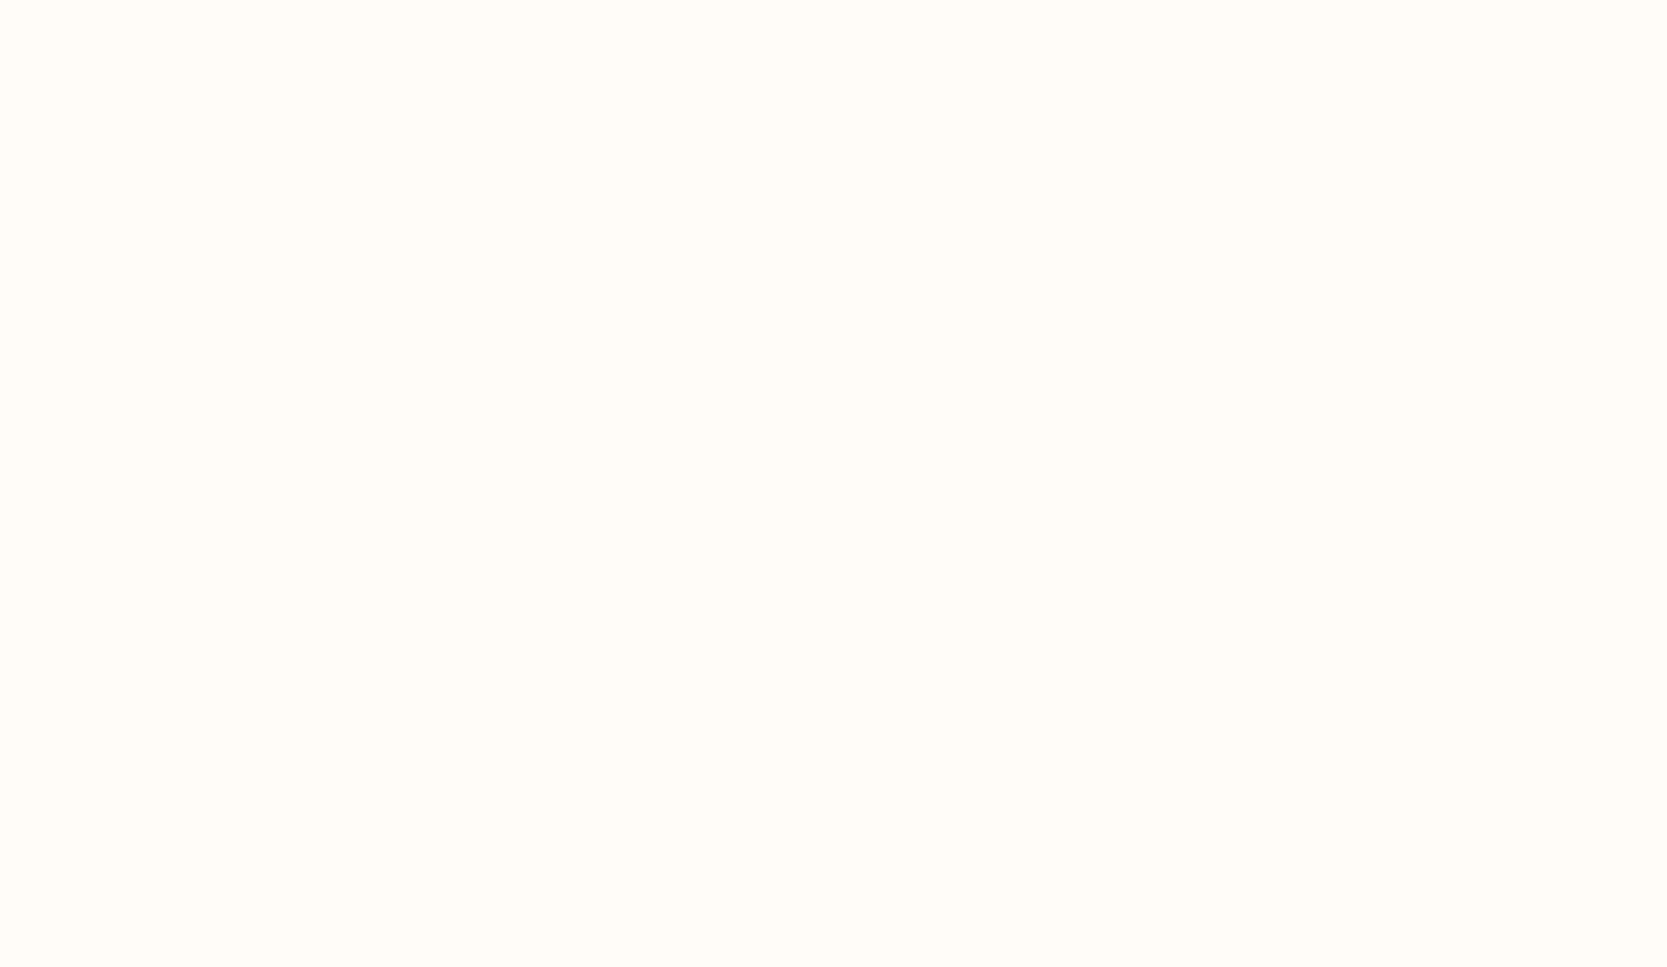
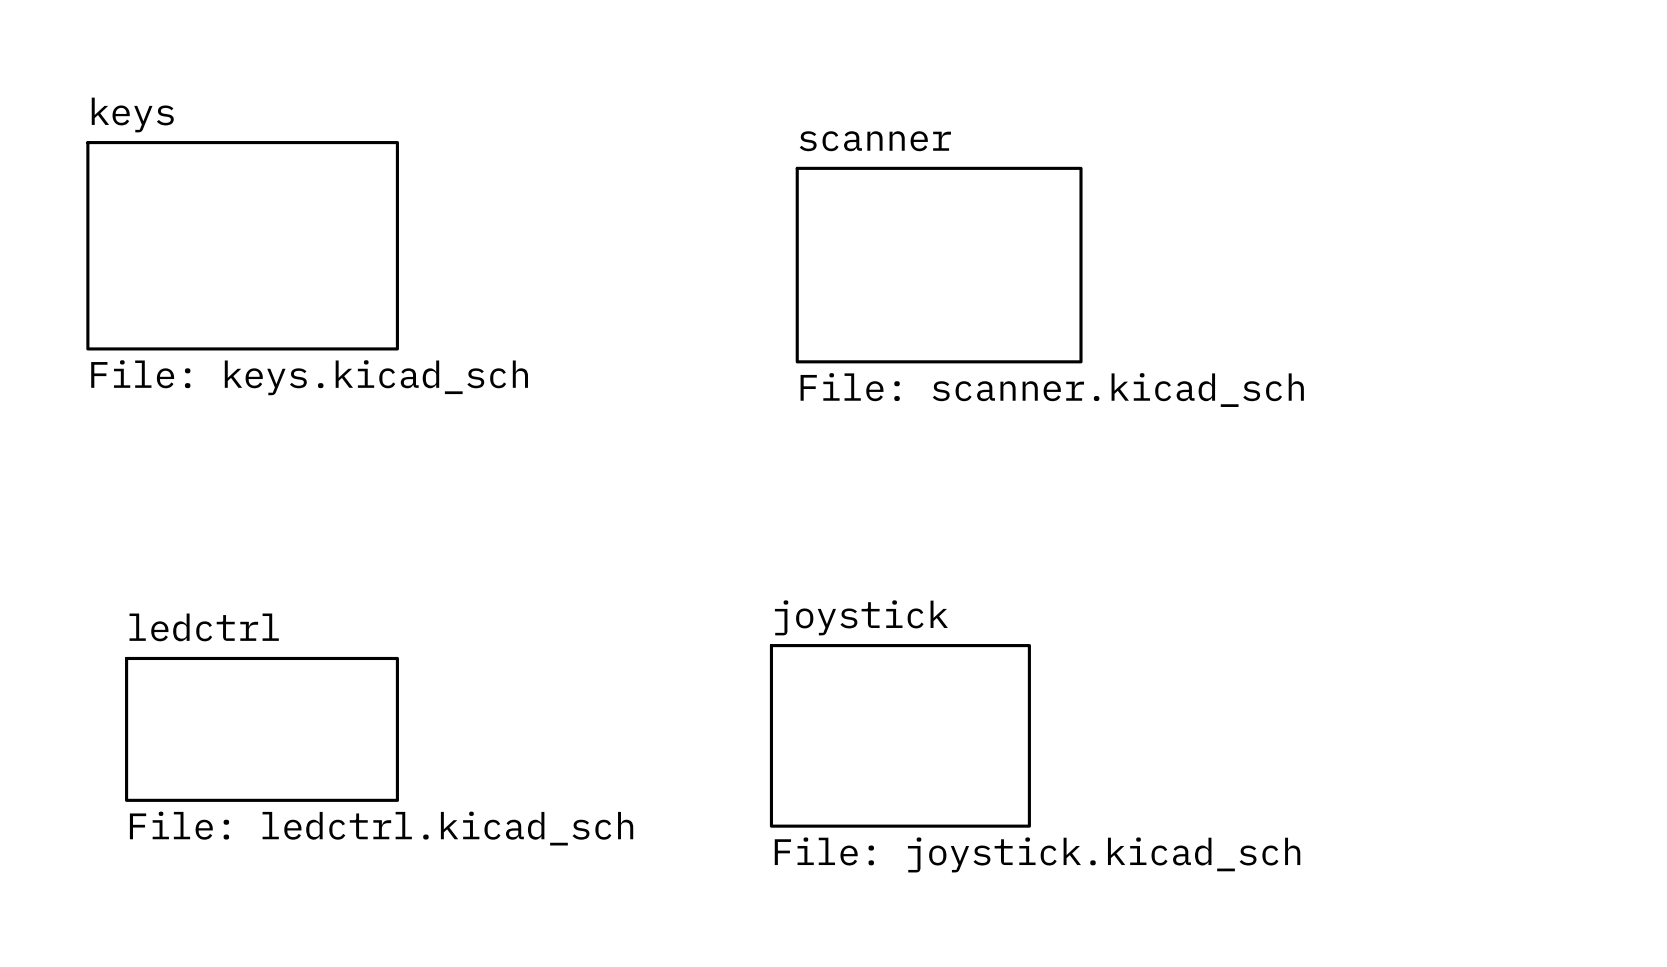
sheet keys: none -> File: keys.kicad_sch (242, 245)
sheet scanner: none -> File: scanner.kicad_sch (939, 265)
sheet ledctrl: none -> File: ledctrl.kicad_sch (262, 729)
sheet joystick: none -> File: joystick.kicad_sch (900, 735)

